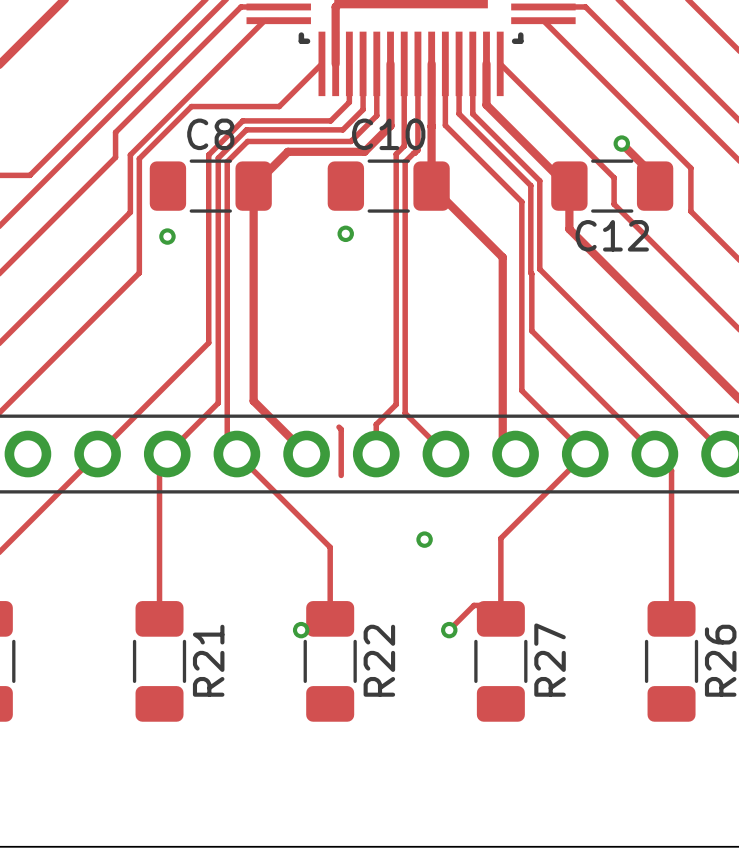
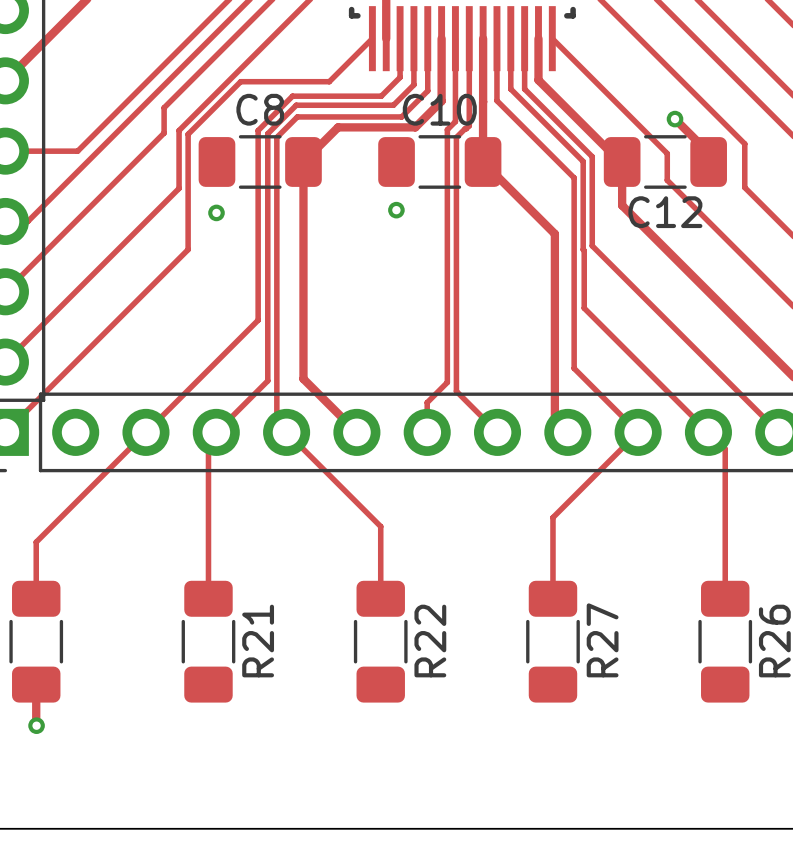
track: (339, 427) (341, 429) (341, 475) -> none
via: (424, 539) -> none
track: (500, 618) (498, 619) (484, 605) (473, 605) (449, 630) -> none
via: (301, 630) -> none
via: (449, 630) -> none

